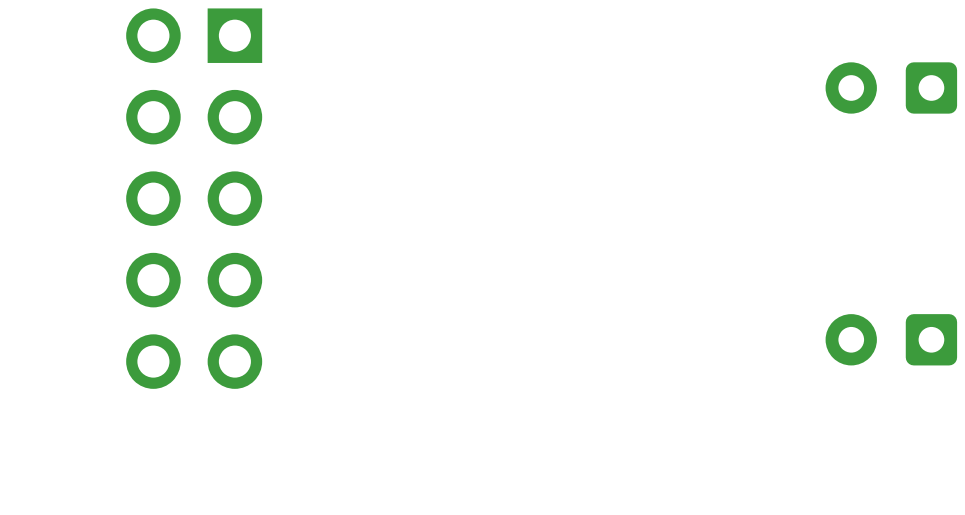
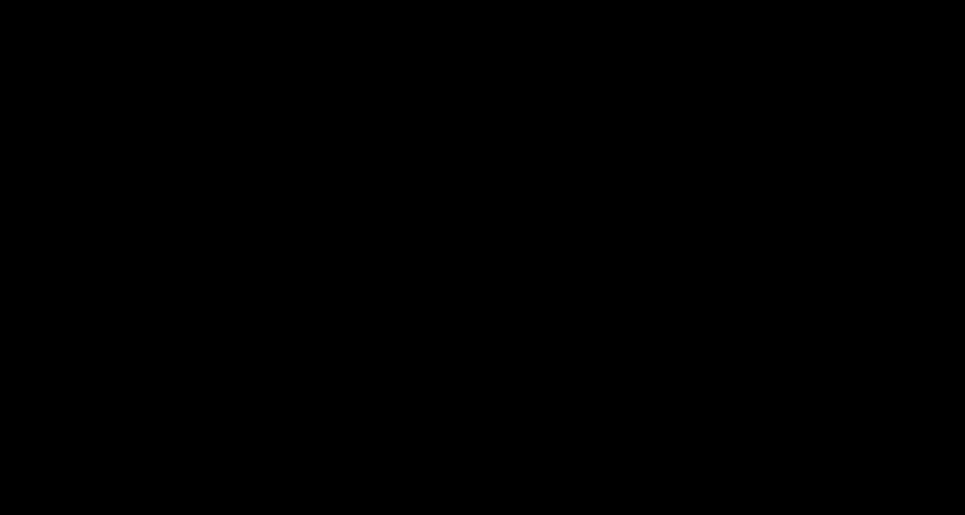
part: (891, 87) -> none
part: (194, 198) -> none
part: (891, 339) -> none

